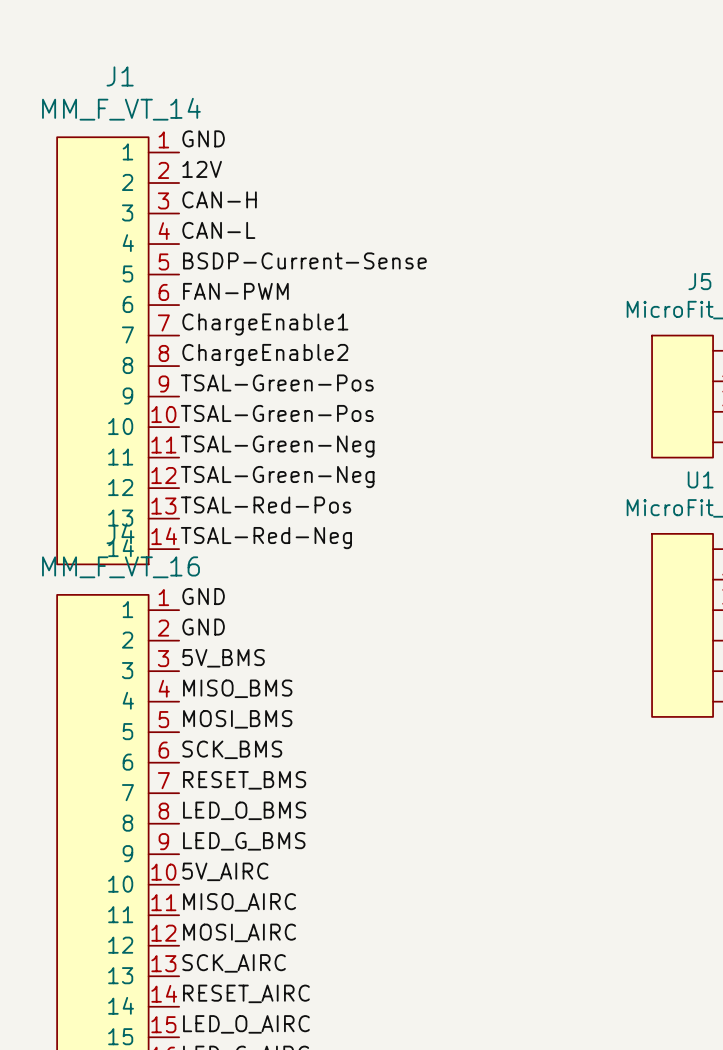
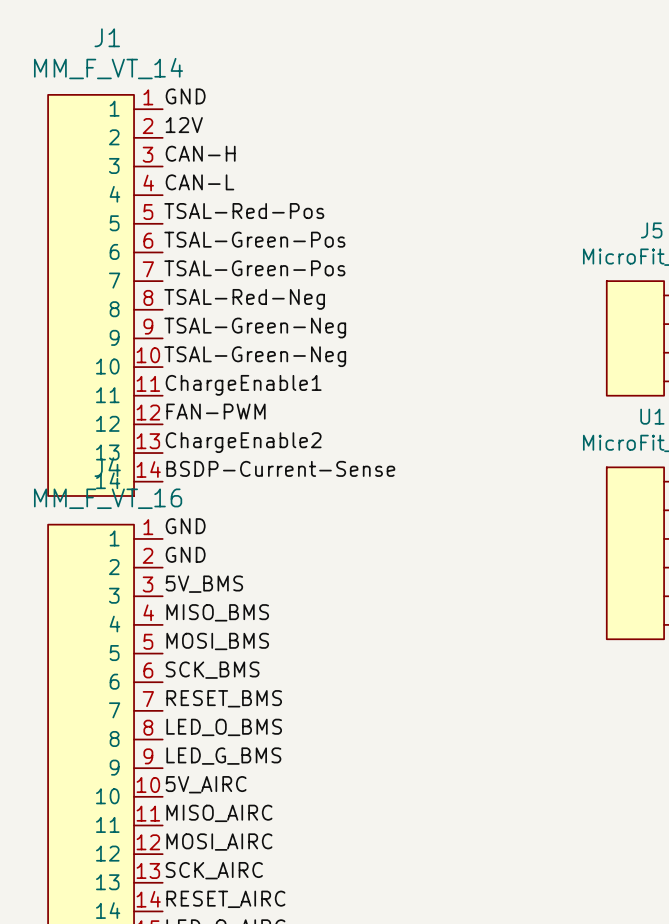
label: BSDP-Current-Sense (304, 260) -> TSAL-Red-Pos (244, 211)
label: FAN-PWM (235, 291) -> TSAL-Green-Pos (254, 239)
label: ChargeEnable1 (265, 324) -> TSAL-Green-Pos (254, 268)
label: ChargeEnable2 (265, 354) -> TSAL-Red-Neg (244, 299)
label: TSAL-Green-Pos (277, 382) -> TSAL-Green-Neg (255, 328)
label: TSAL-Green-Pos (277, 413) -> TSAL-Green-Neg (255, 356)
label: TSAL-Green-Neg (277, 446) -> ChargeEnable1 (243, 385)
label: TSAL-Green-Neg (277, 477) -> FAN-PWM (216, 411)
label: TSAL-Red-Pos (266, 505) -> ChargeEnable2 (243, 442)
label: TSAL-Red-Neg (266, 538) -> BSDP-Current-Sense (280, 468)

